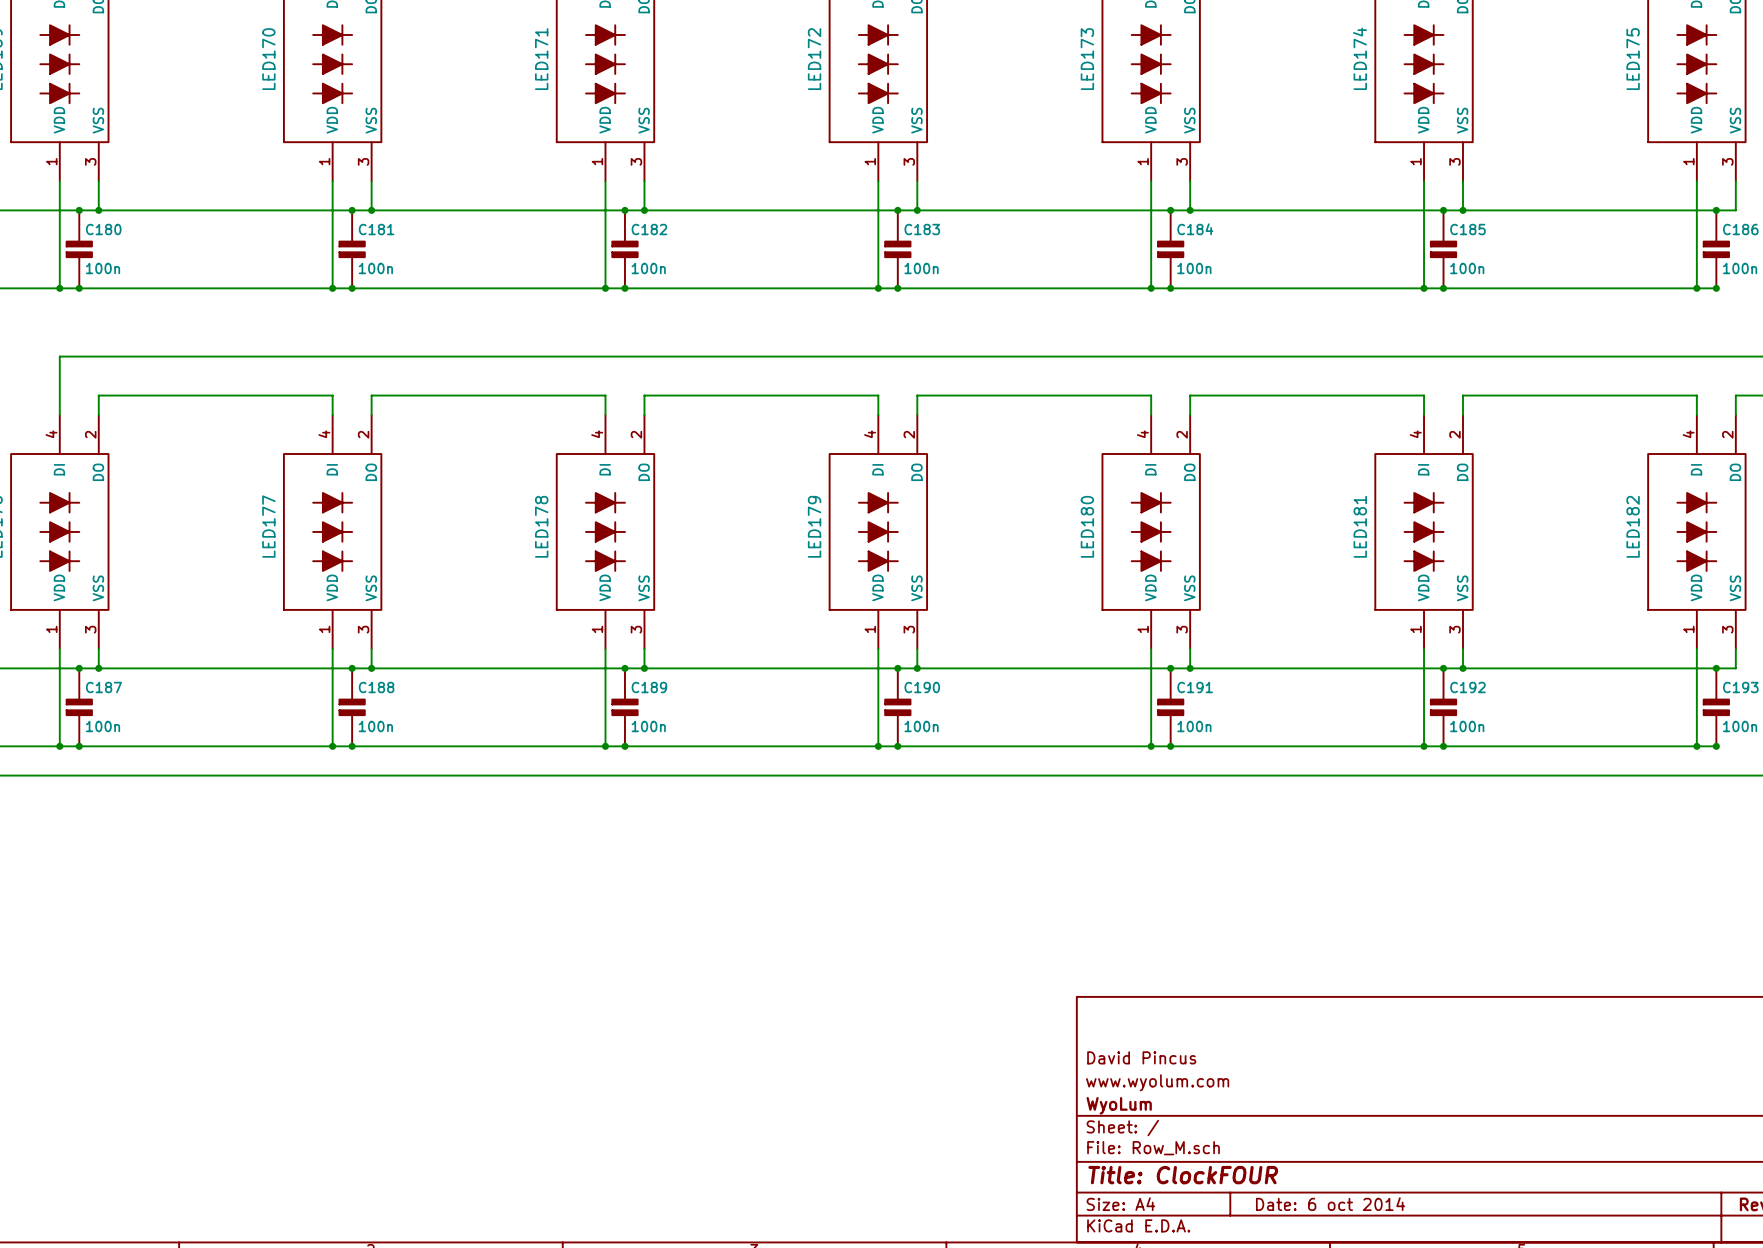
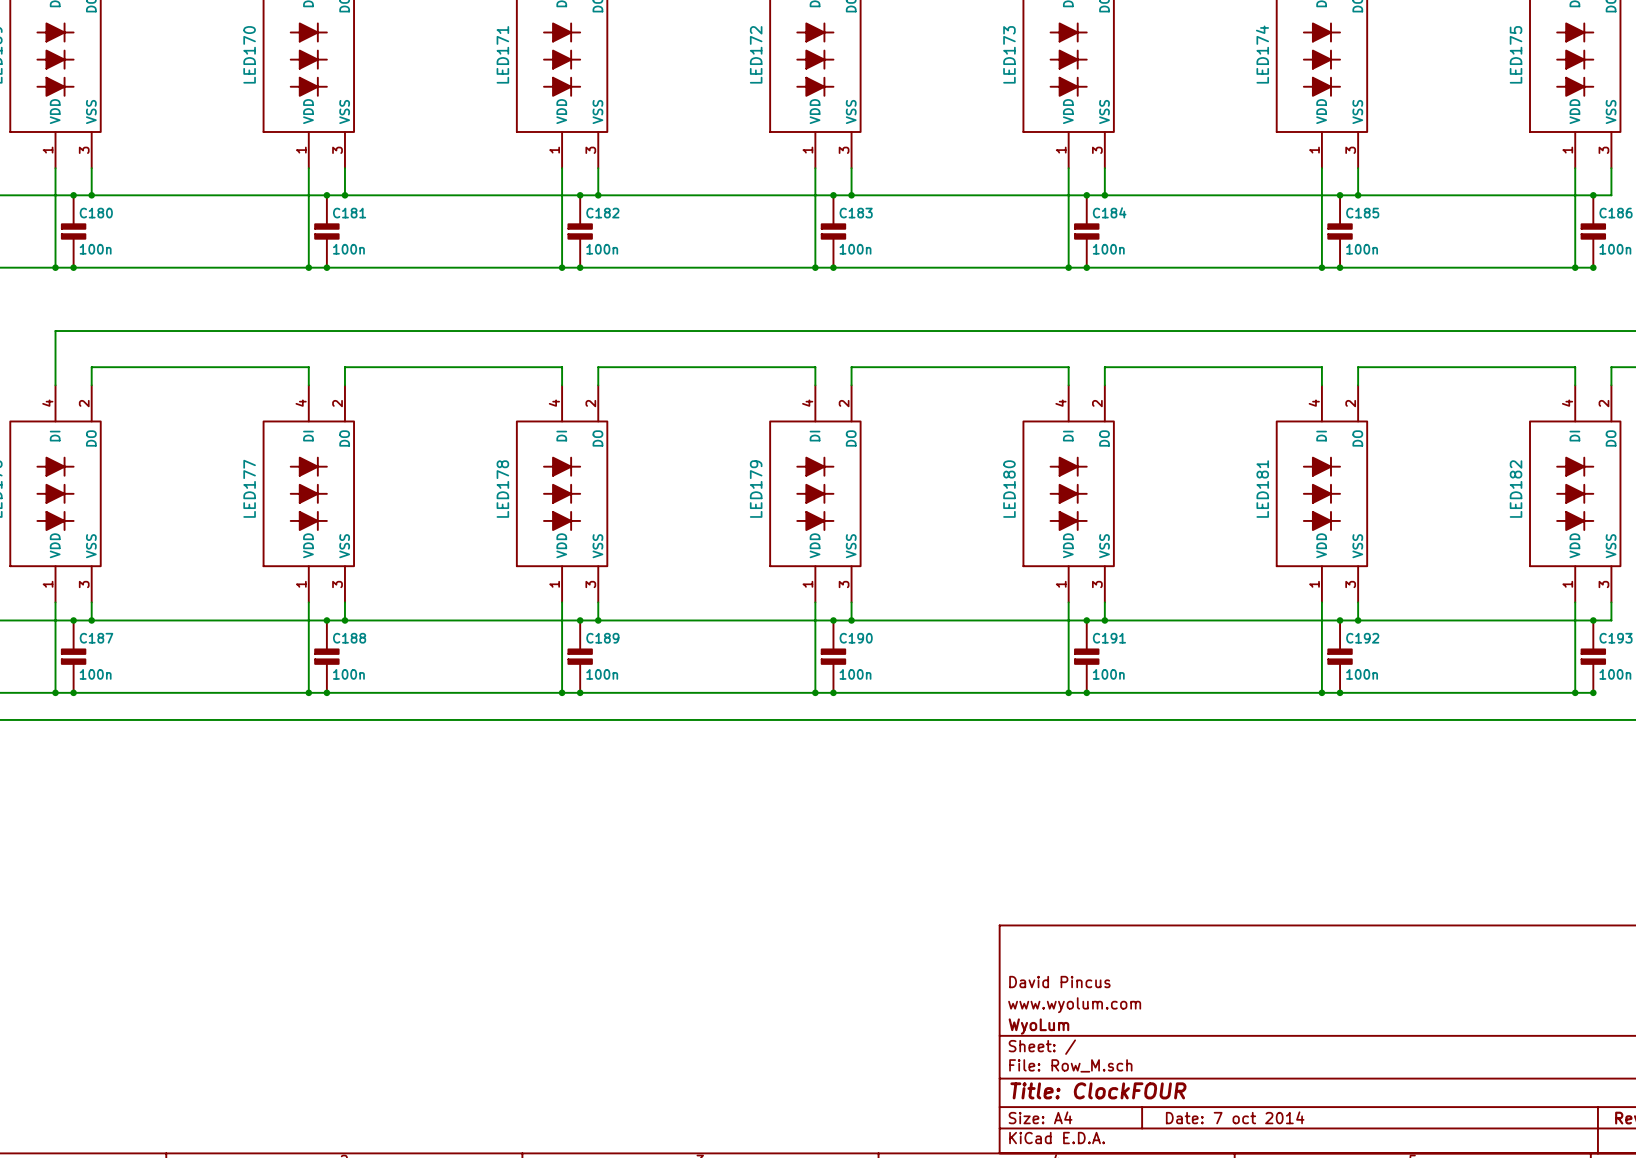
title block: Date: 6 oct 2014 (1330, 1204) -> Date: 7 oct 2014 (1235, 1117)

